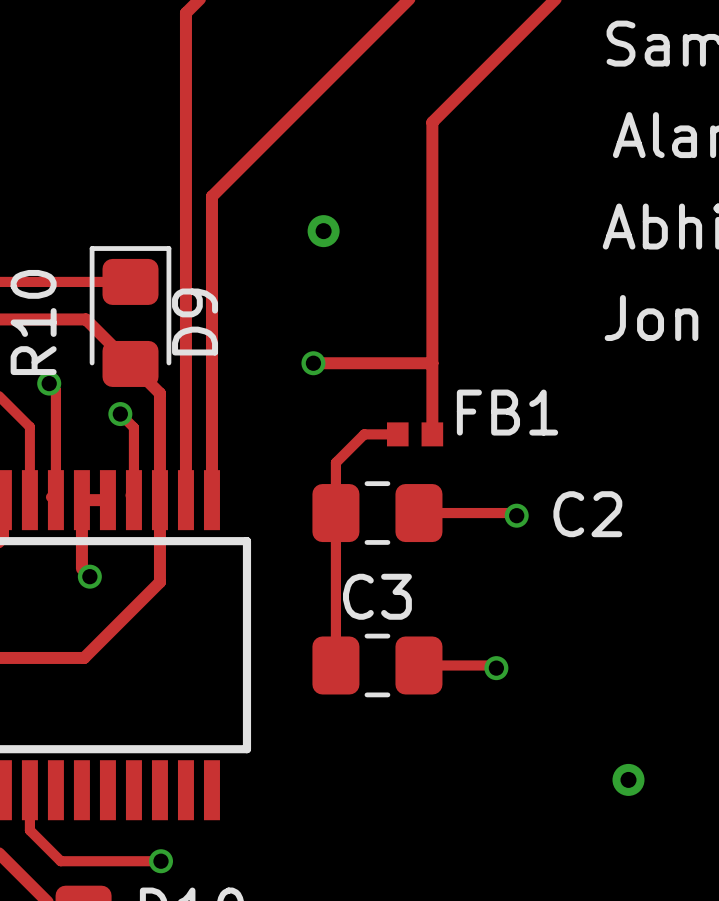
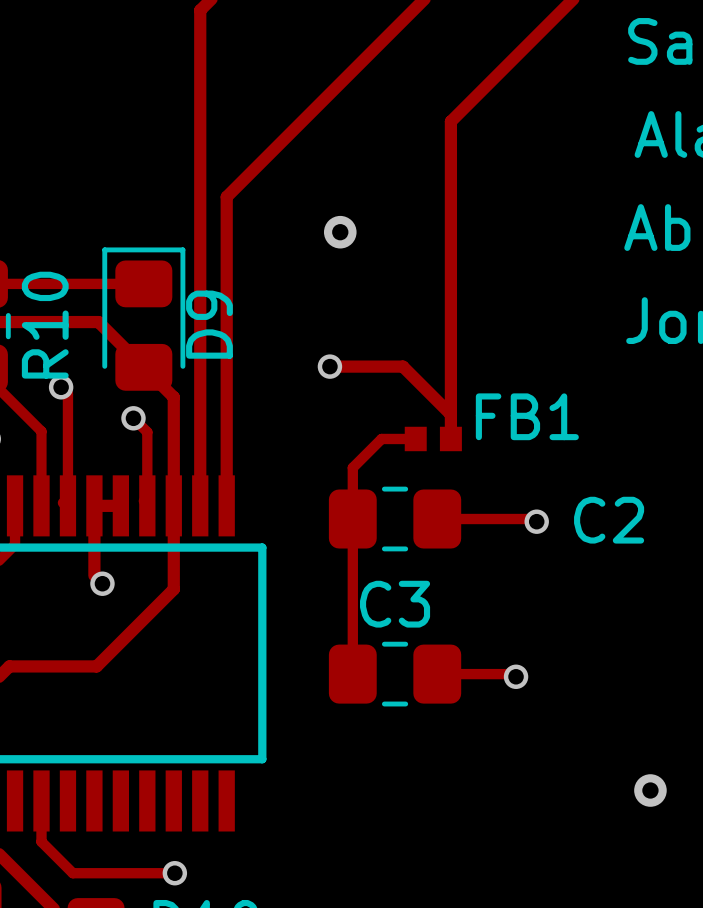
track: (385, 363) (432, 363) -> (402, 366) (450, 414)

